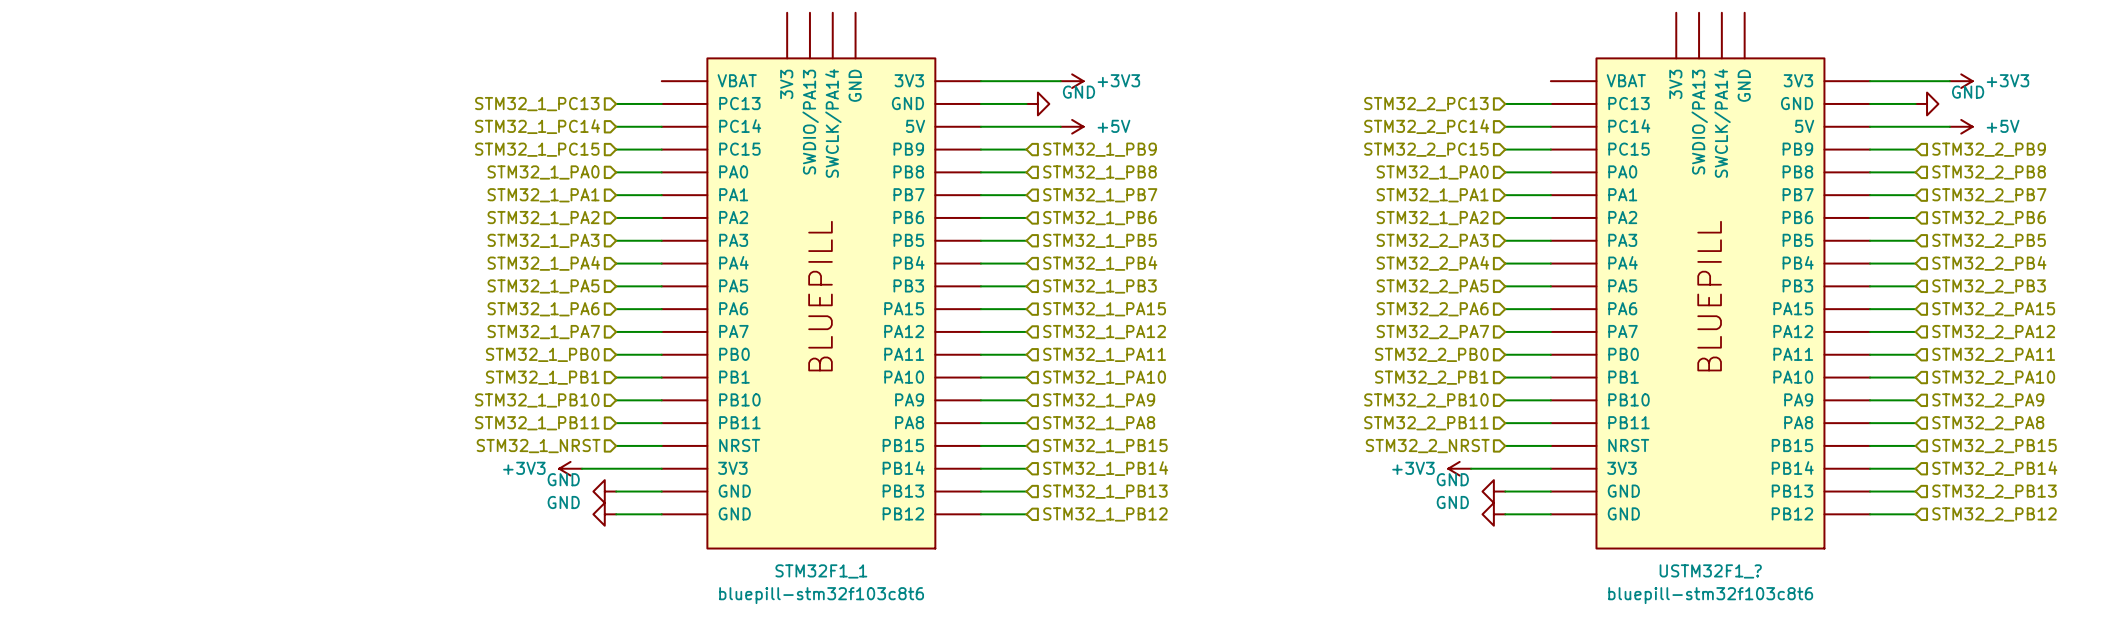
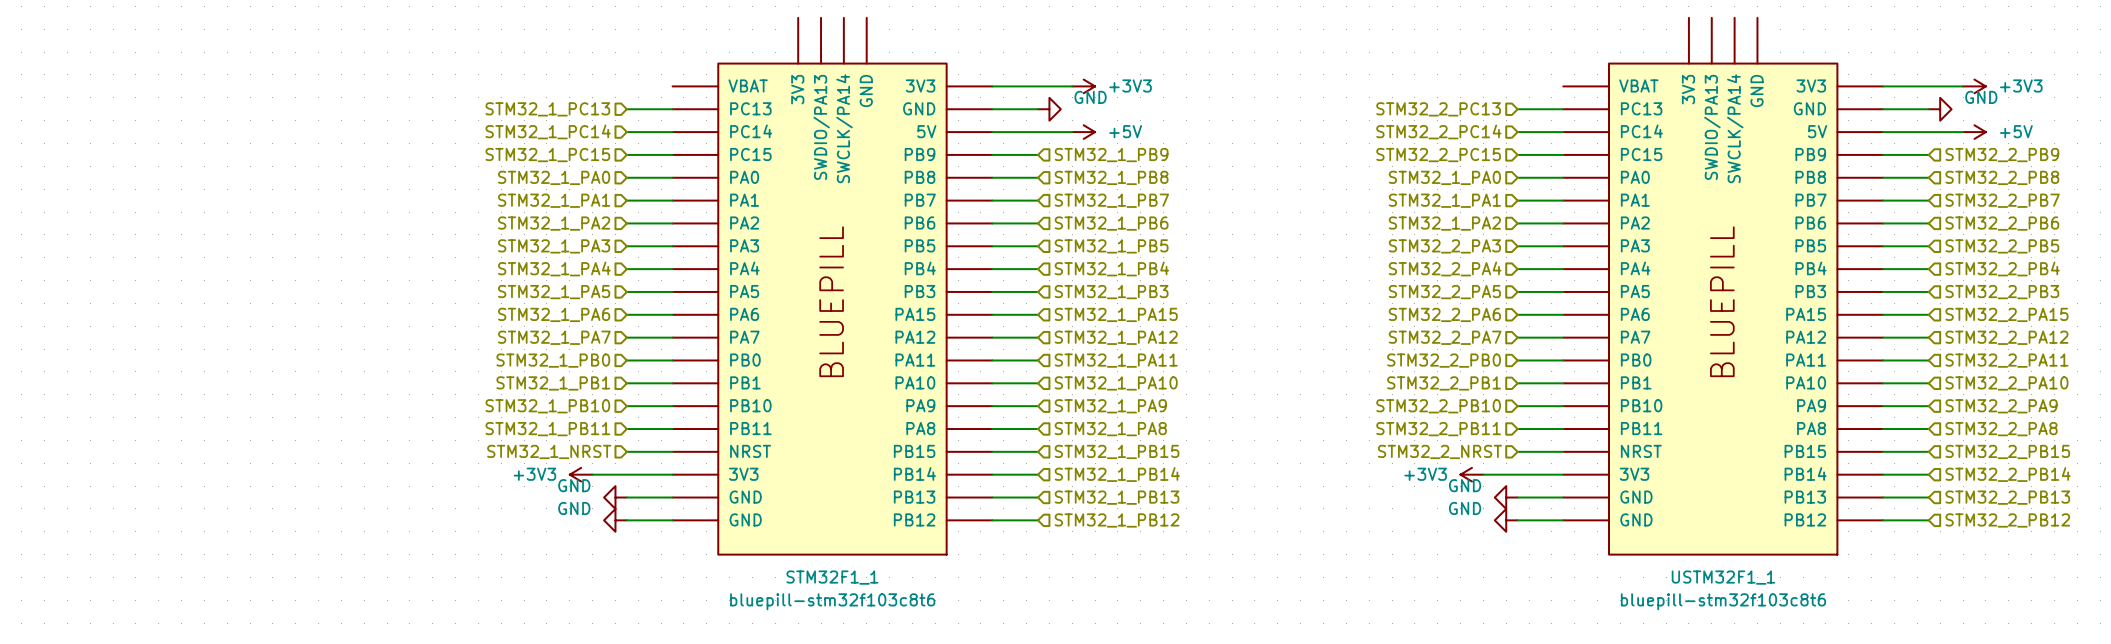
USTM32F1_? name: USTM32F1_? (1710, 571) -> USTM32F1_1 (1723, 577)

